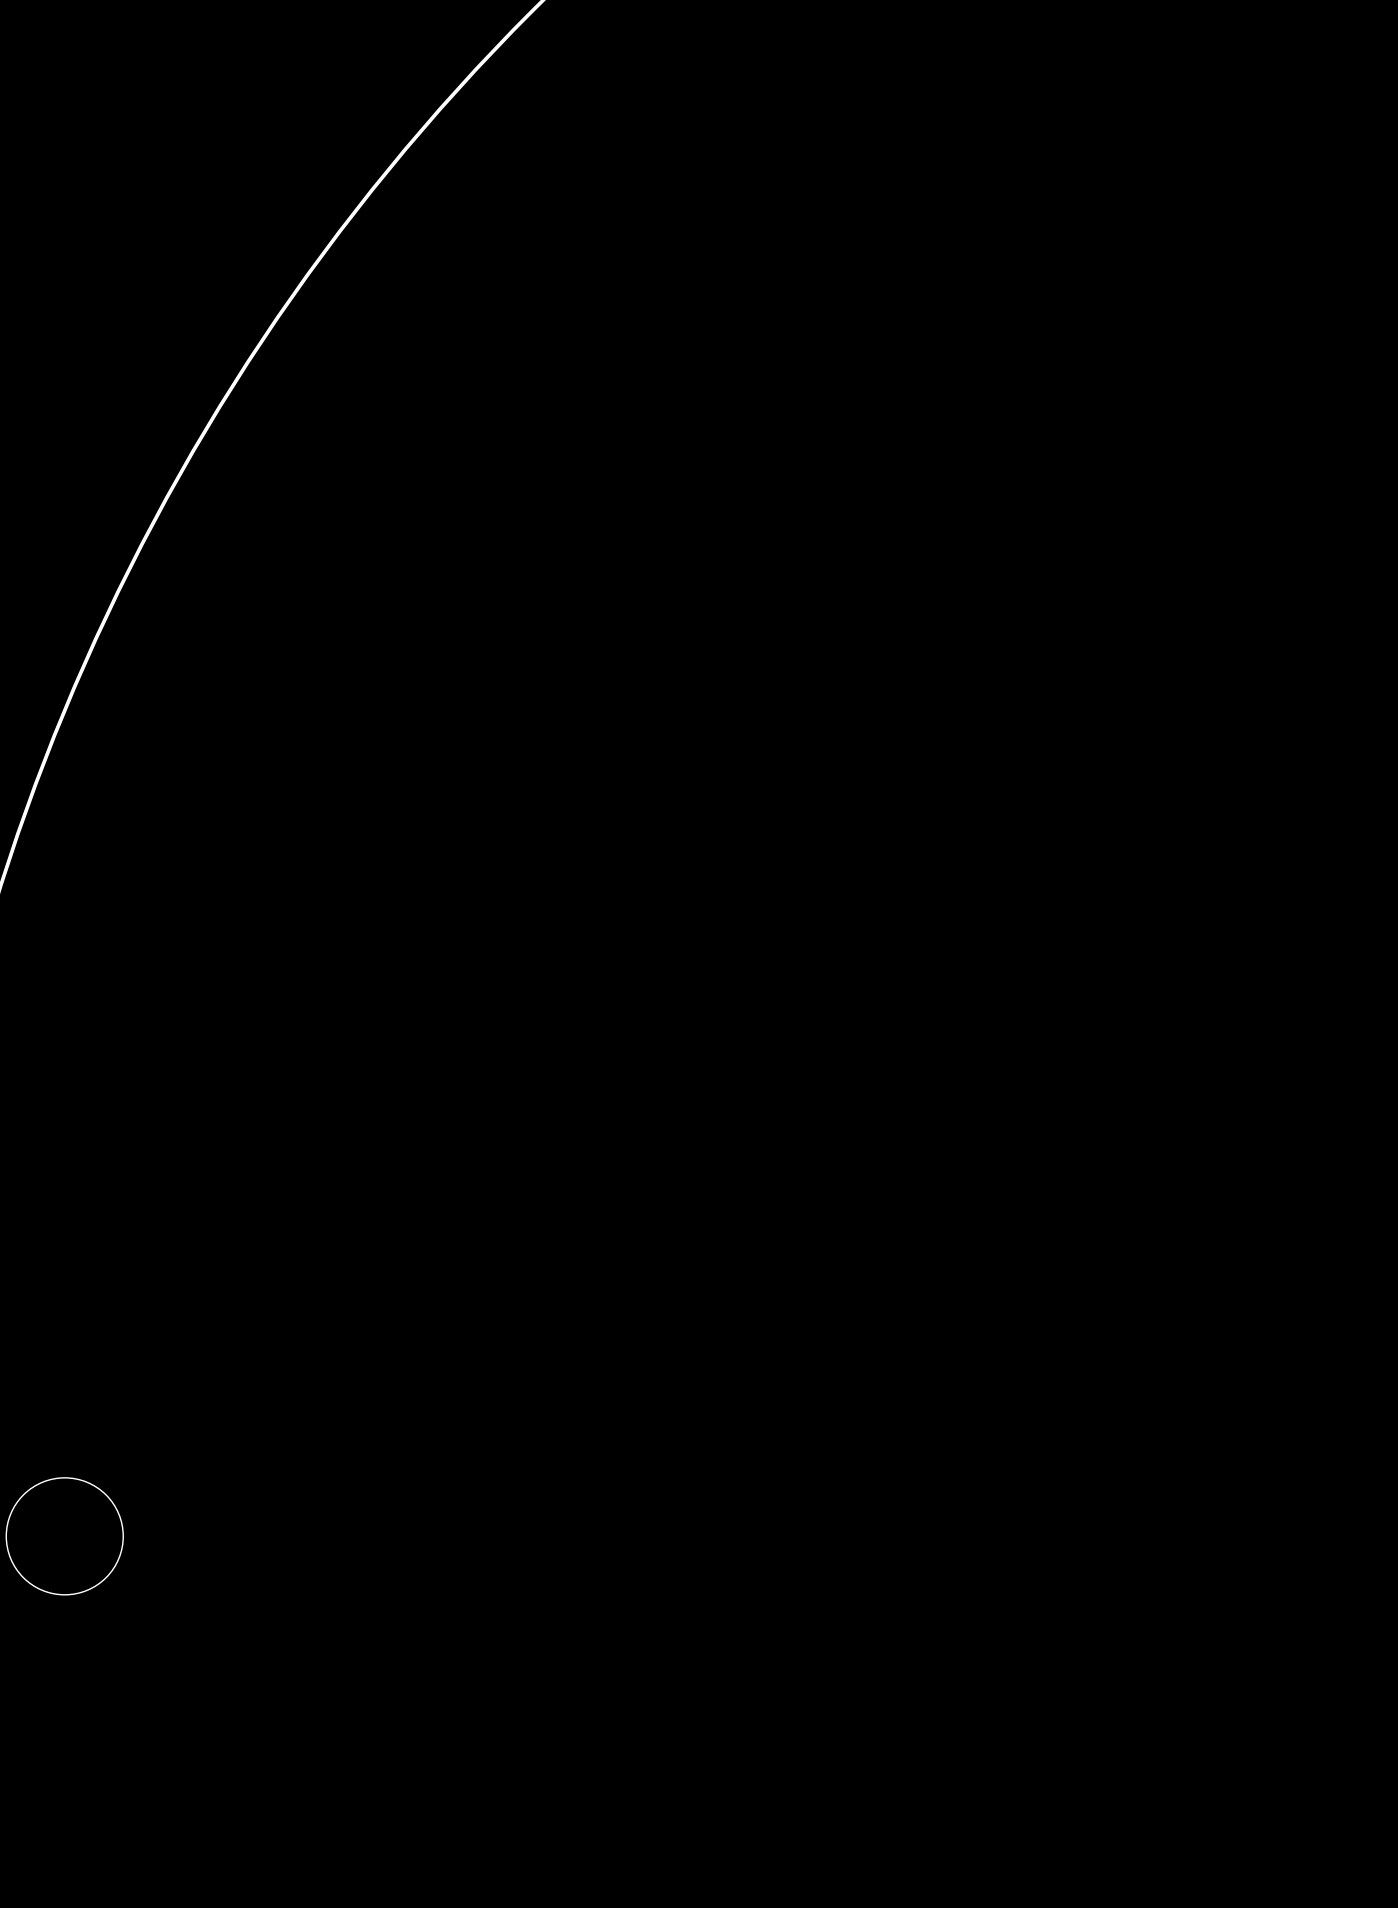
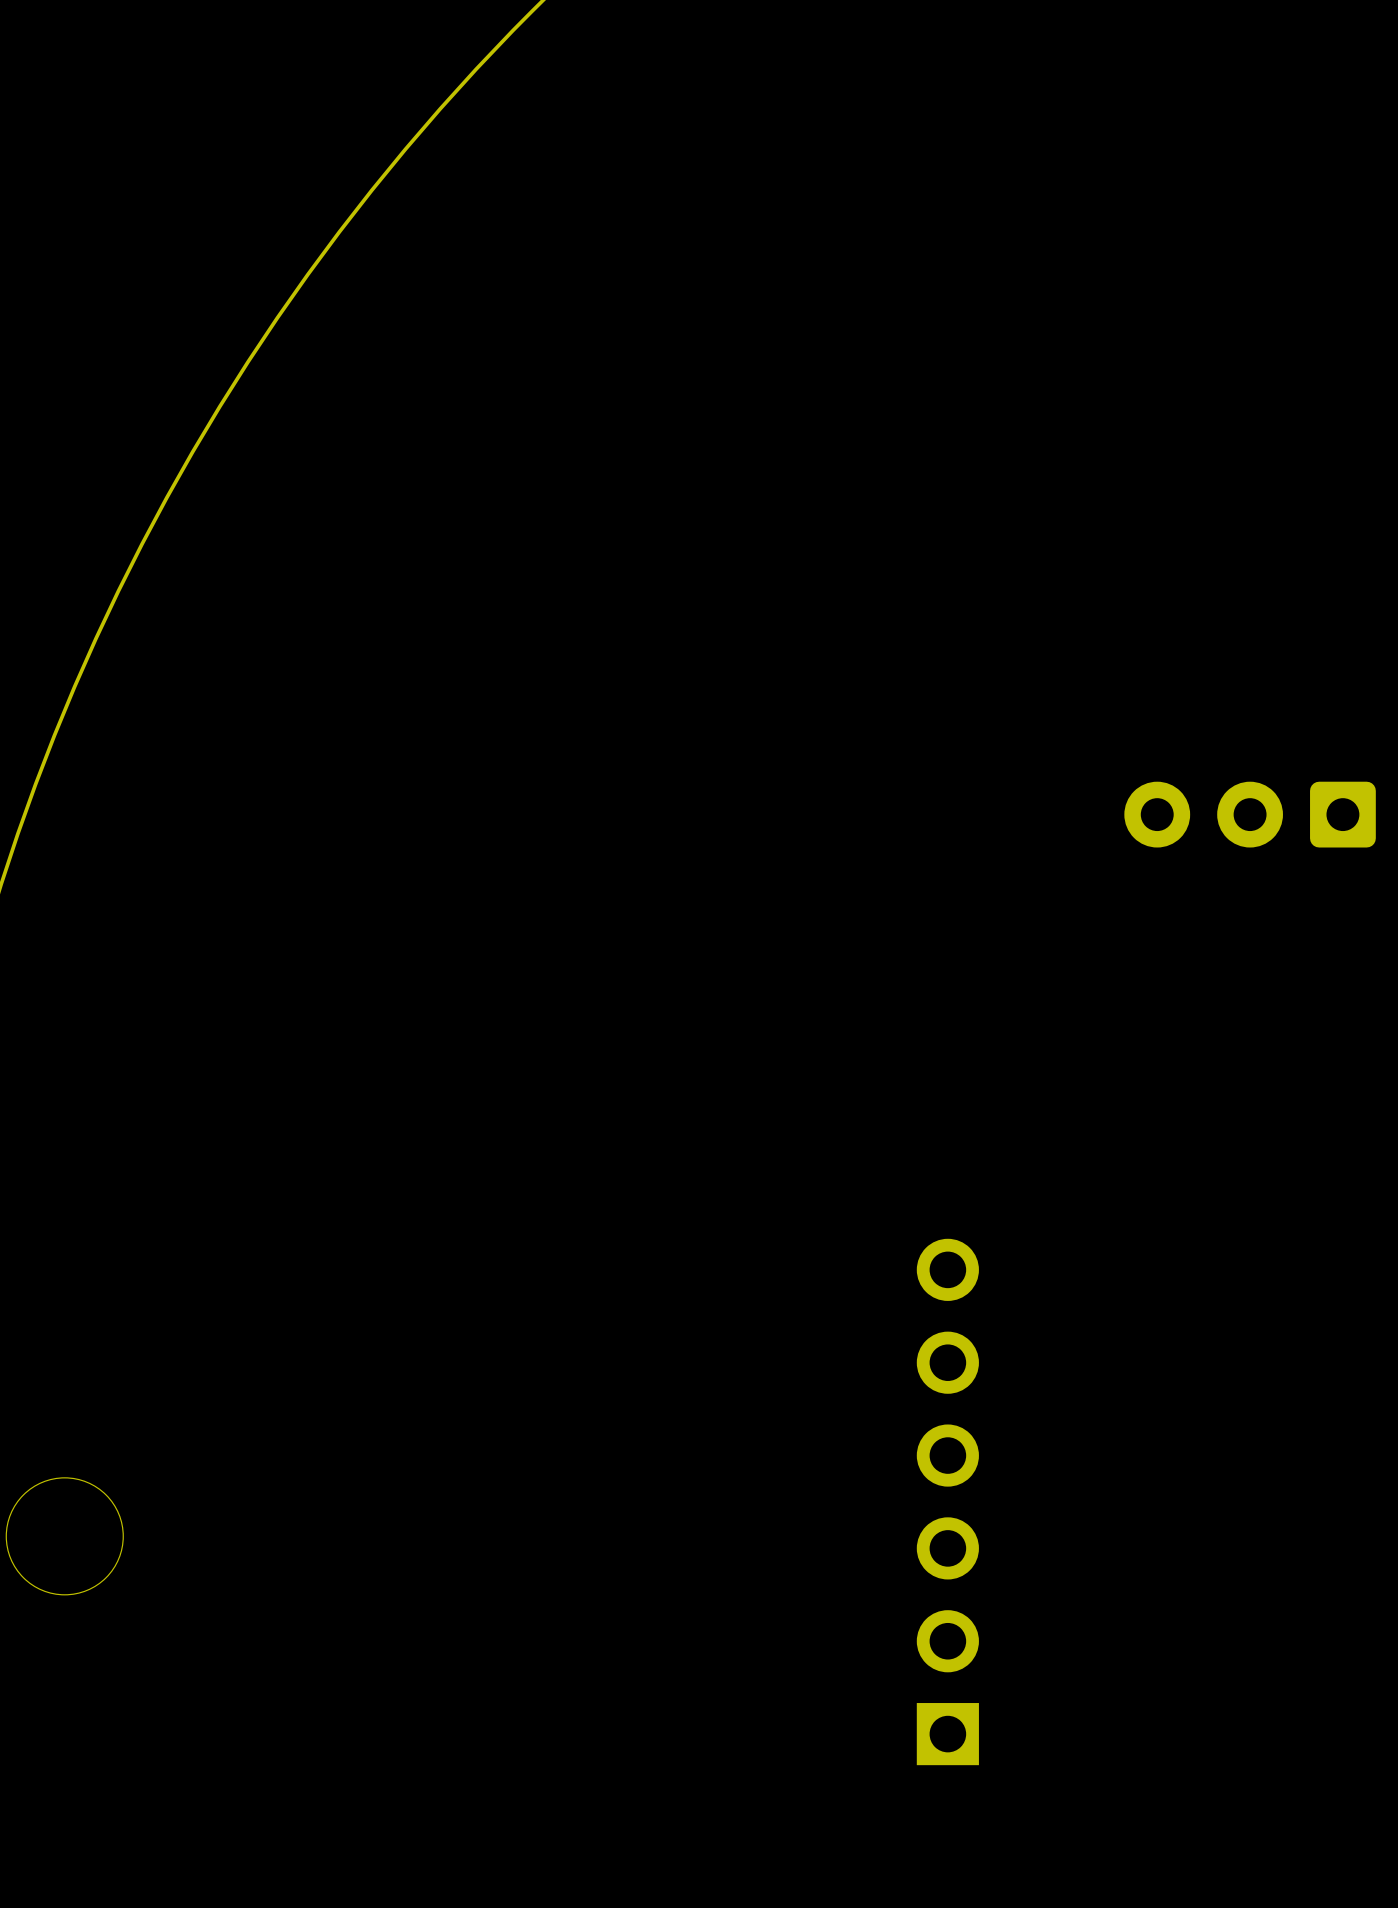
part: none -> (1250, 814)
part: none -> (947, 1501)

